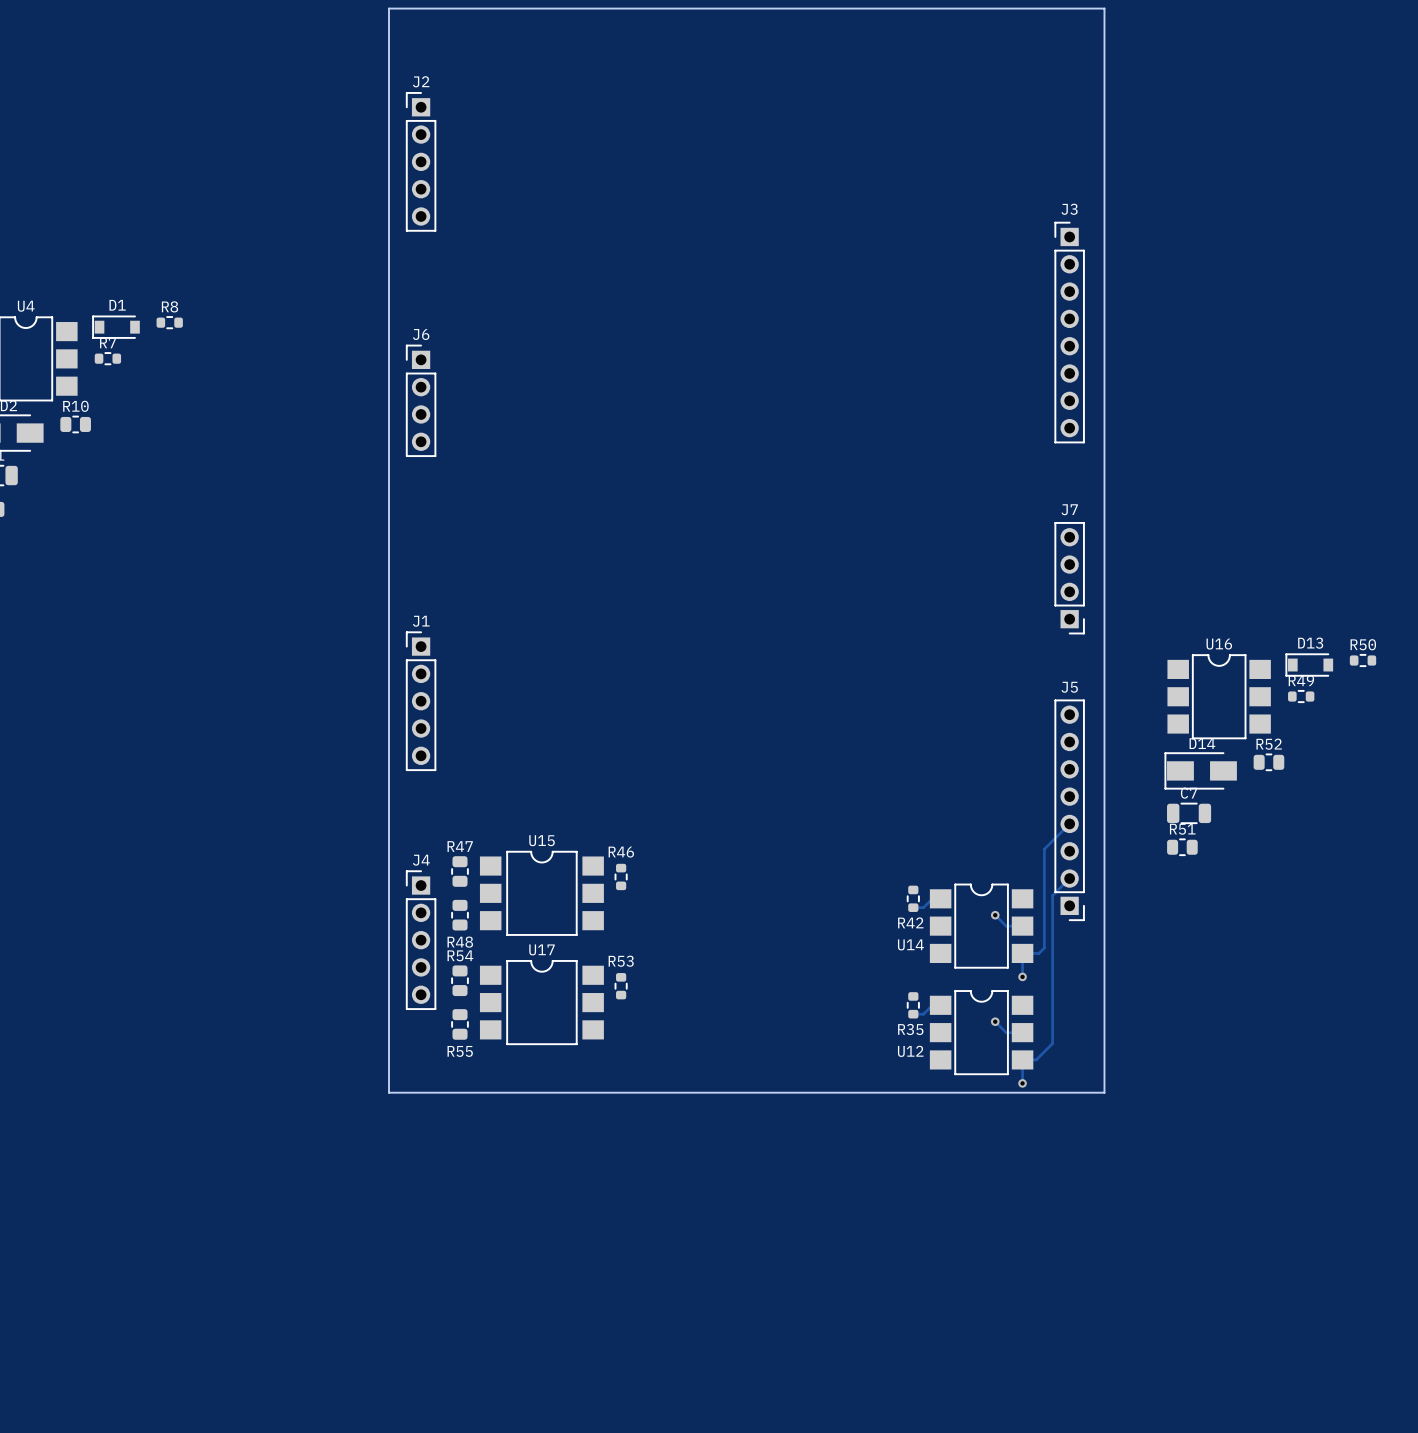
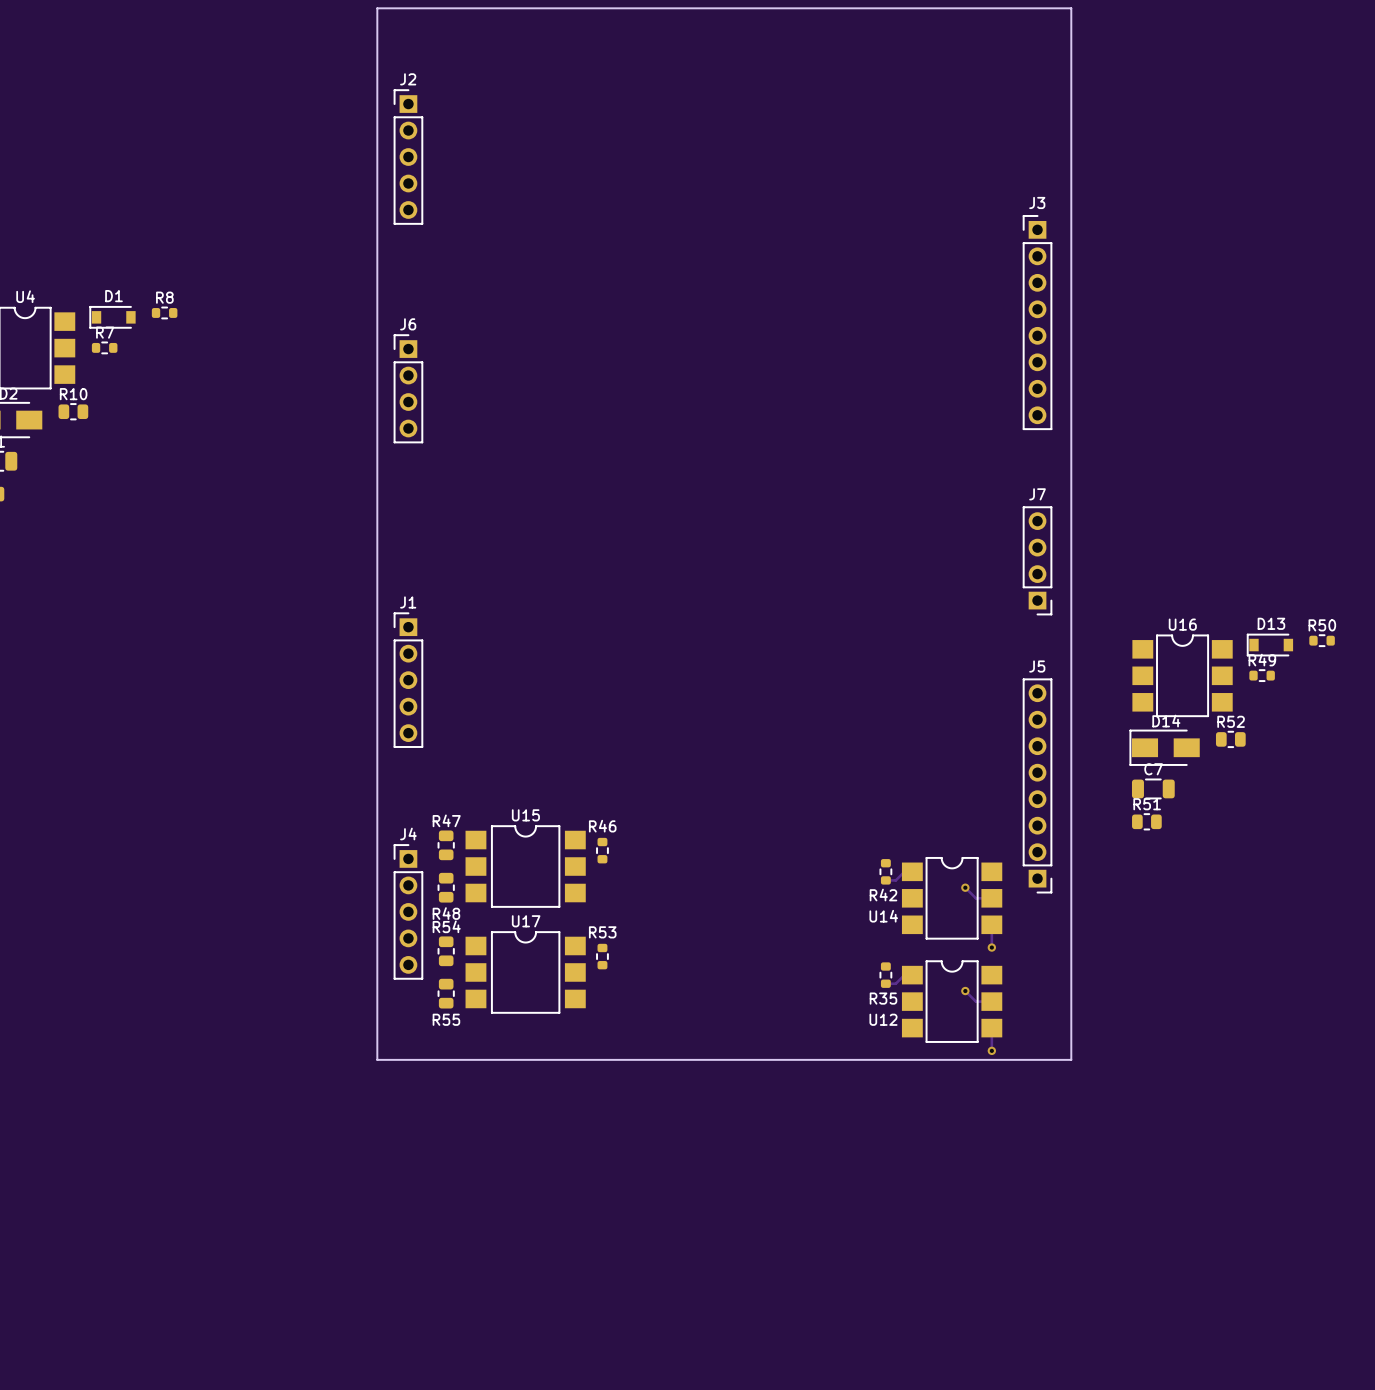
track: (1069, 823) (1044, 849) (1044, 947) (1038, 953) (1022, 953) -> none
track: (1069, 878) (1052, 895) (1052, 1043) (1036, 1059) (1022, 1059) -> none

